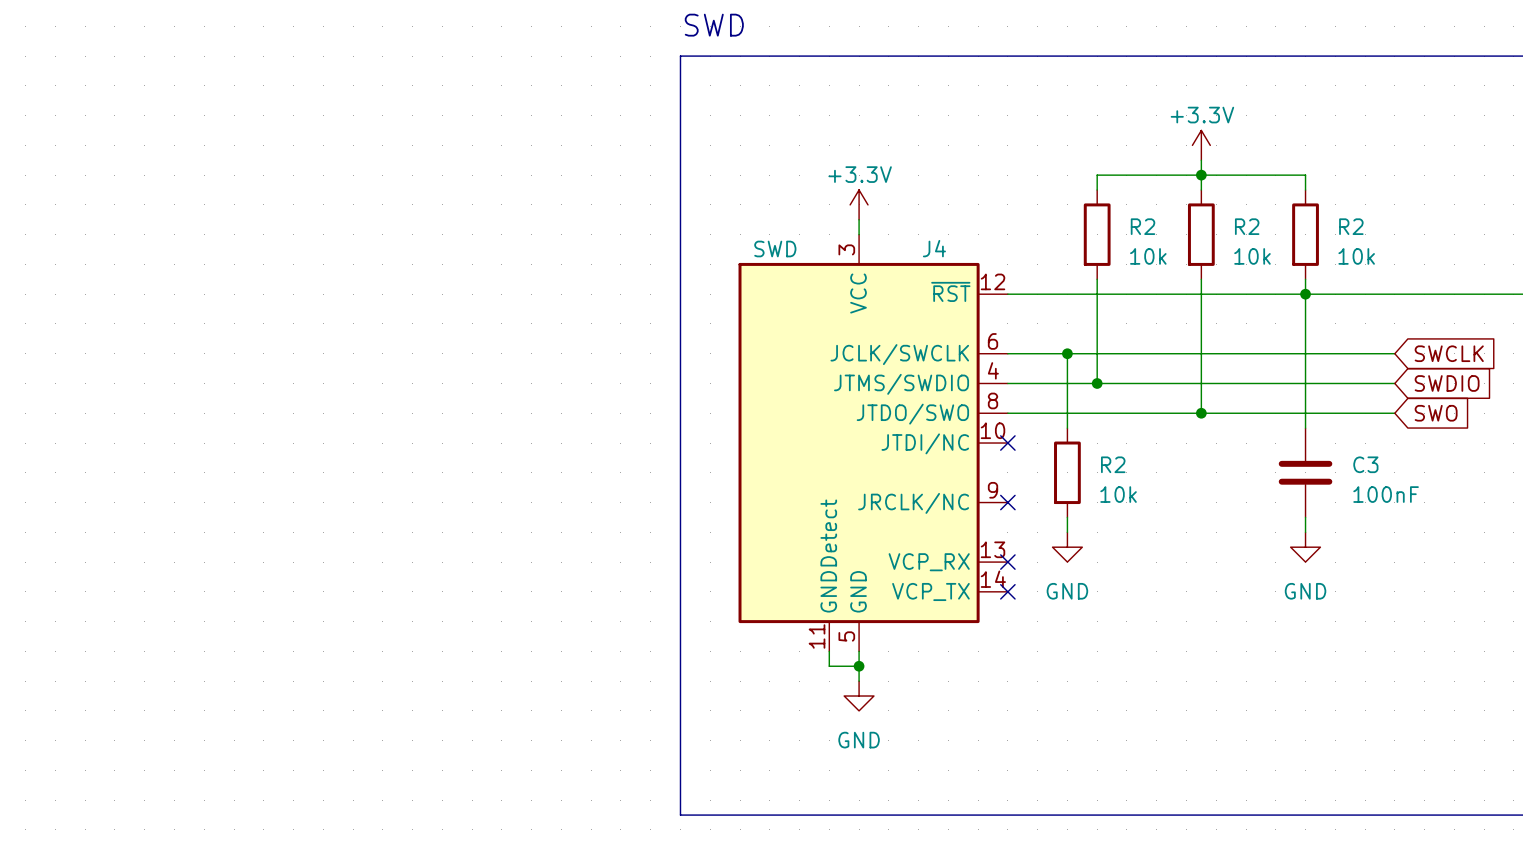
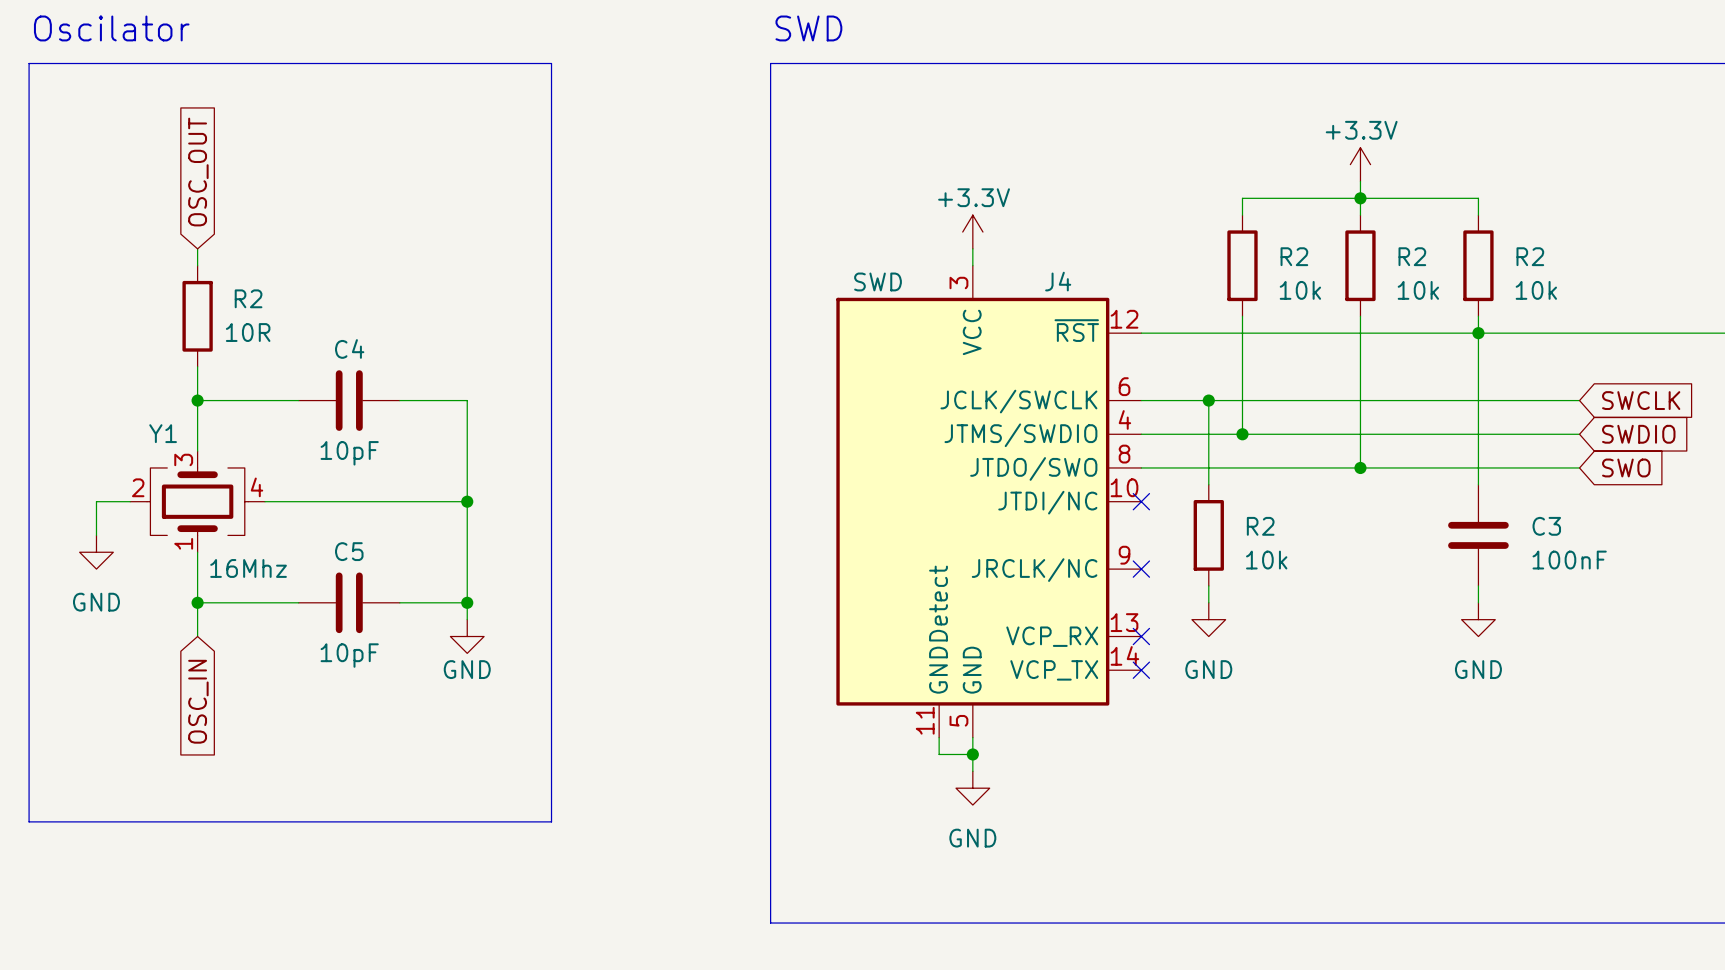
text: none -> Oscilator (111, 28)
line: none -> (29, 63) (551, 63) (551, 821) (29, 821) (29, 63)
global label: none -> OSC_OUT (198, 172)
wire: none -> (197, 248) (197, 265)
R2: none -> 10R (197, 316)
wire: none -> (197, 366) (197, 451)
wire: none -> (197, 400) (298, 400)
junction: none -> (197, 400)
C4: none -> 10pF (349, 400)
wire: none -> (399, 400) (467, 400) (467, 619)
wire: none -> (130, 501) (96, 501) (96, 535)
Y1: none -> 16Mhz (197, 501)
wire: none -> (265, 501) (467, 501)
junction: none -> (467, 501)
power symbol: none -> GND (96, 552)
wire: none -> (197, 552) (197, 636)
wire: none -> (197, 602) (298, 602)
junction: none -> (197, 602)
C5: none -> 10pF (349, 602)
wire: none -> (399, 602) (467, 602)
junction: none -> (467, 602)
power symbol: none -> GND (467, 636)
global label: none -> OSC_IN (198, 701)

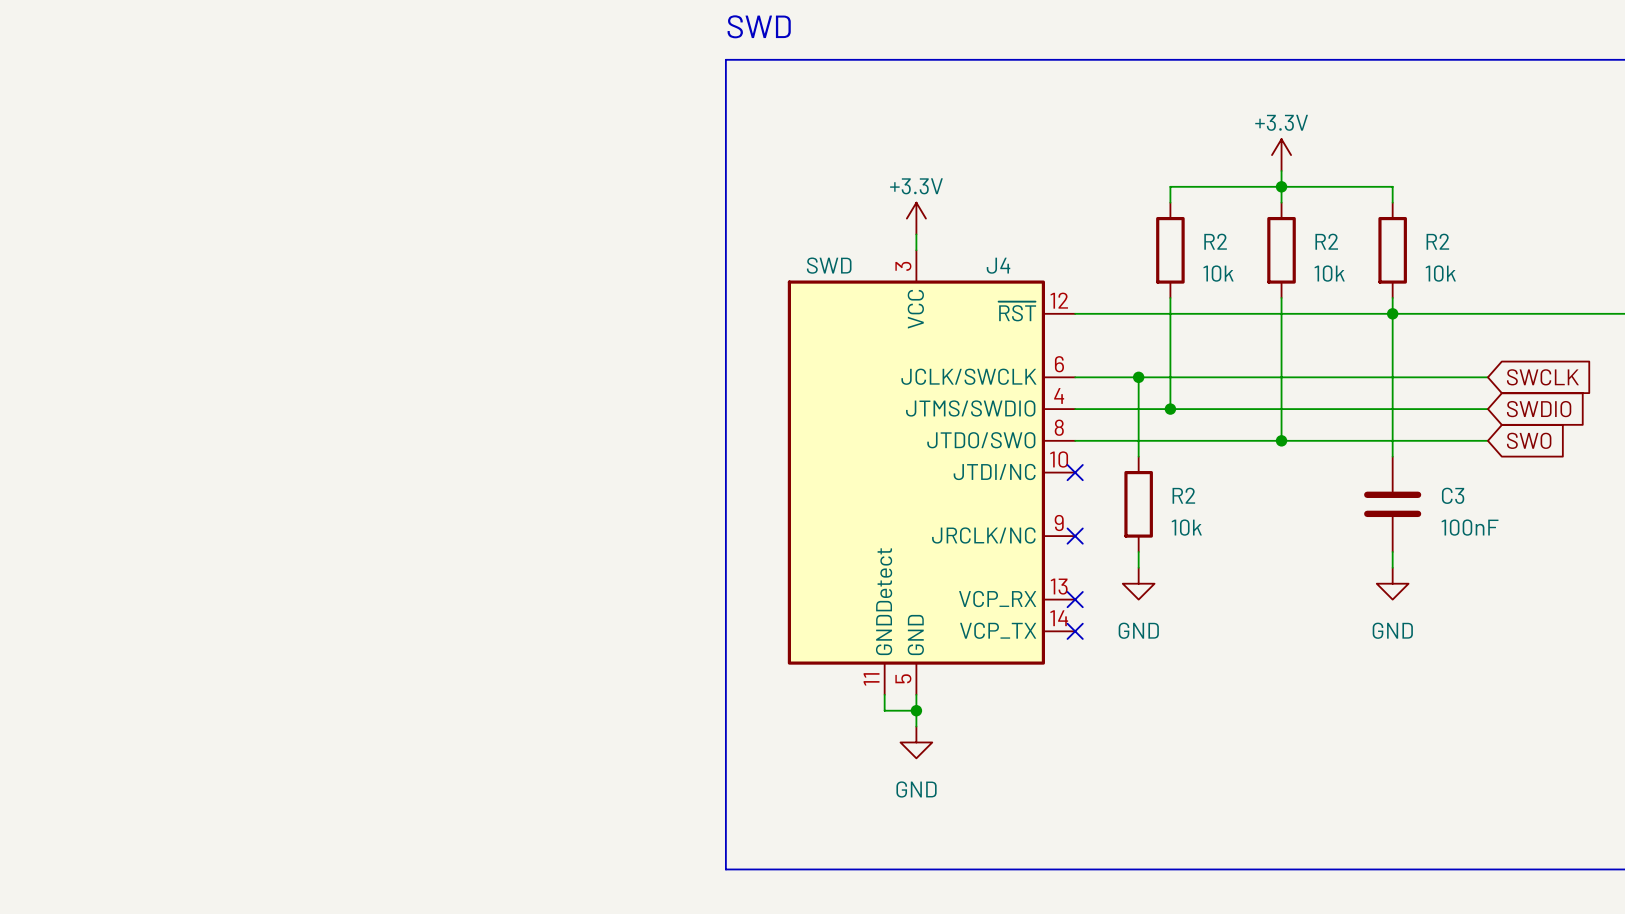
text: Oscilator (111, 28) -> none
line: (29, 63) (551, 63) (551, 821) (29, 821) (29, 63) -> none
global label: OSC_OUT (198, 172) -> none
wire: (197, 248) (197, 265) -> none
R2: 10R (197, 316) -> none
wire: (197, 366) (197, 451) -> none
wire: (197, 400) (298, 400) -> none
junction: (197, 400) -> none
C4: 10pF (349, 400) -> none
wire: (399, 400) (467, 400) (467, 619) -> none
wire: (130, 501) (96, 501) (96, 535) -> none
Y1: 16Mhz (197, 501) -> none
wire: (265, 501) (467, 501) -> none
junction: (467, 501) -> none
power symbol: GND (96, 552) -> none
wire: (197, 552) (197, 636) -> none
wire: (197, 602) (298, 602) -> none
junction: (197, 602) -> none
C5: 10pF (349, 602) -> none
wire: (399, 602) (467, 602) -> none
junction: (467, 602) -> none
power symbol: GND (467, 636) -> none
global label: OSC_IN (198, 701) -> none

